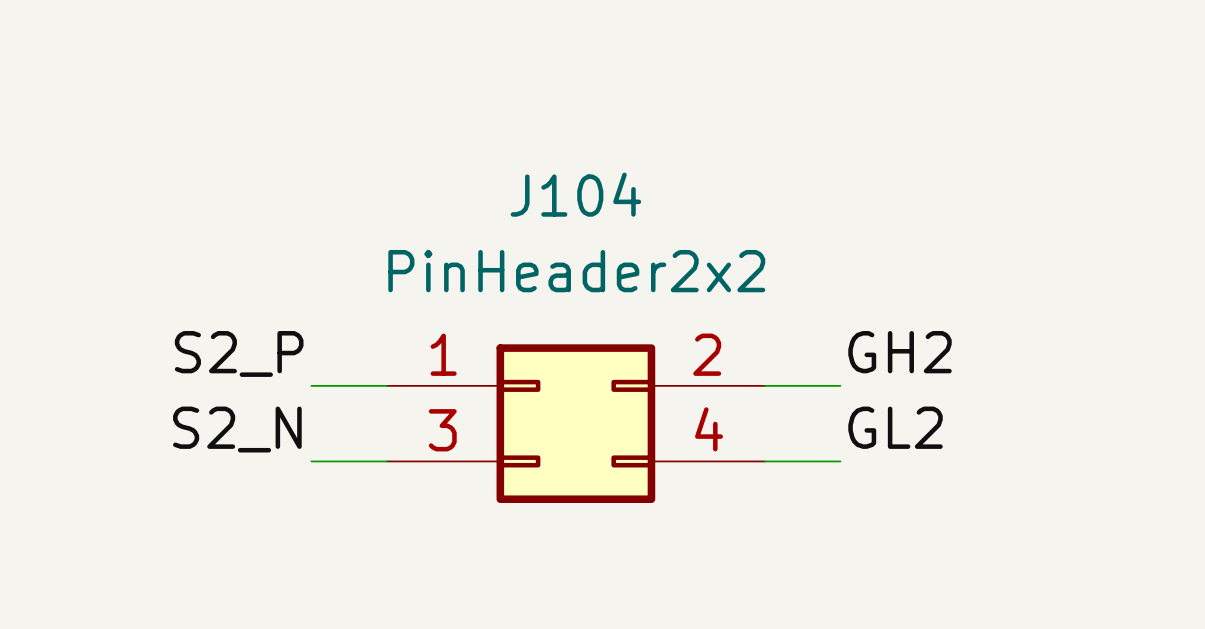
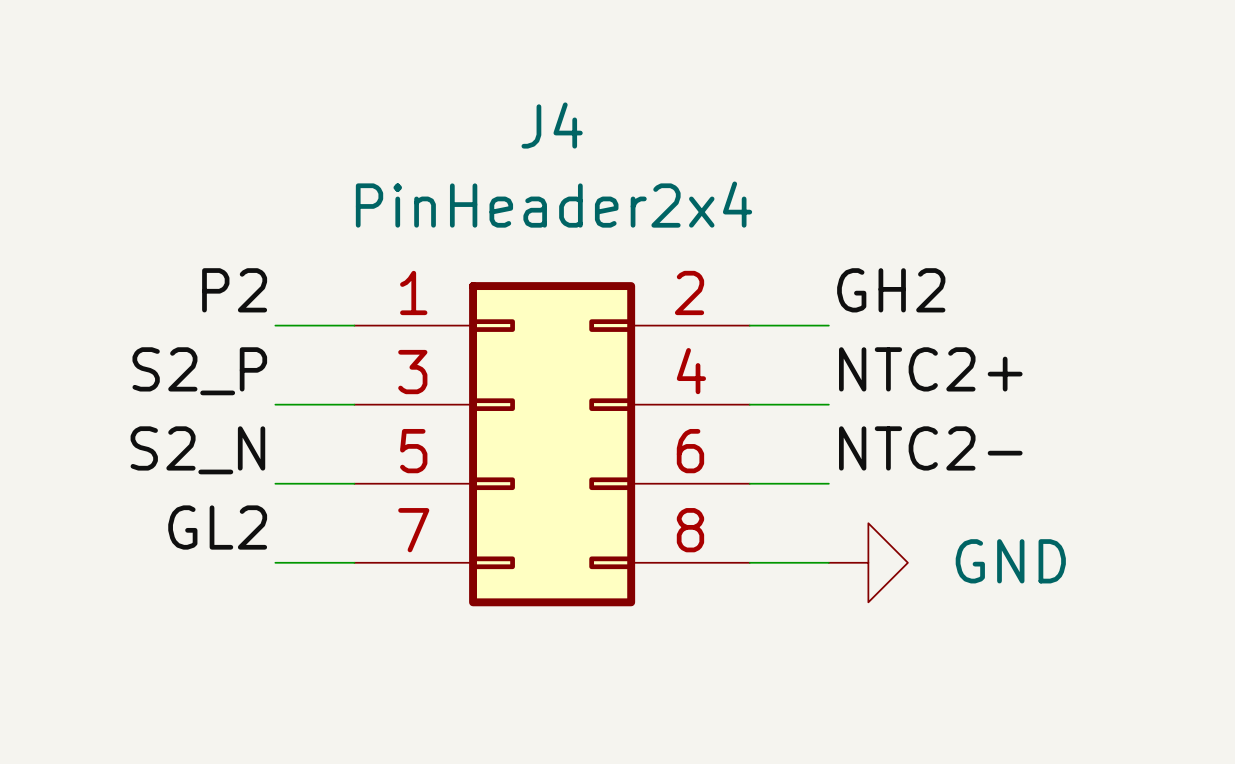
label: none -> P2 (234, 290)
label: none -> GH2 (891, 290)
wire: none -> (275, 325) (354, 325)
wire: none -> (749, 325) (828, 325)
label: GH2 (900, 352) -> NTC2+ (930, 369)
J104: PinHeader2x2 (575, 423) -> none
J4: none -> PinHeader2x4 (552, 444)
label: GL2 (895, 427) -> NTC2- (930, 448)
label: none -> GL2 (217, 527)
wire: none -> (275, 562) (354, 562)
wire: none -> (749, 562) (828, 562)
power symbol: none -> GND (868, 562)

